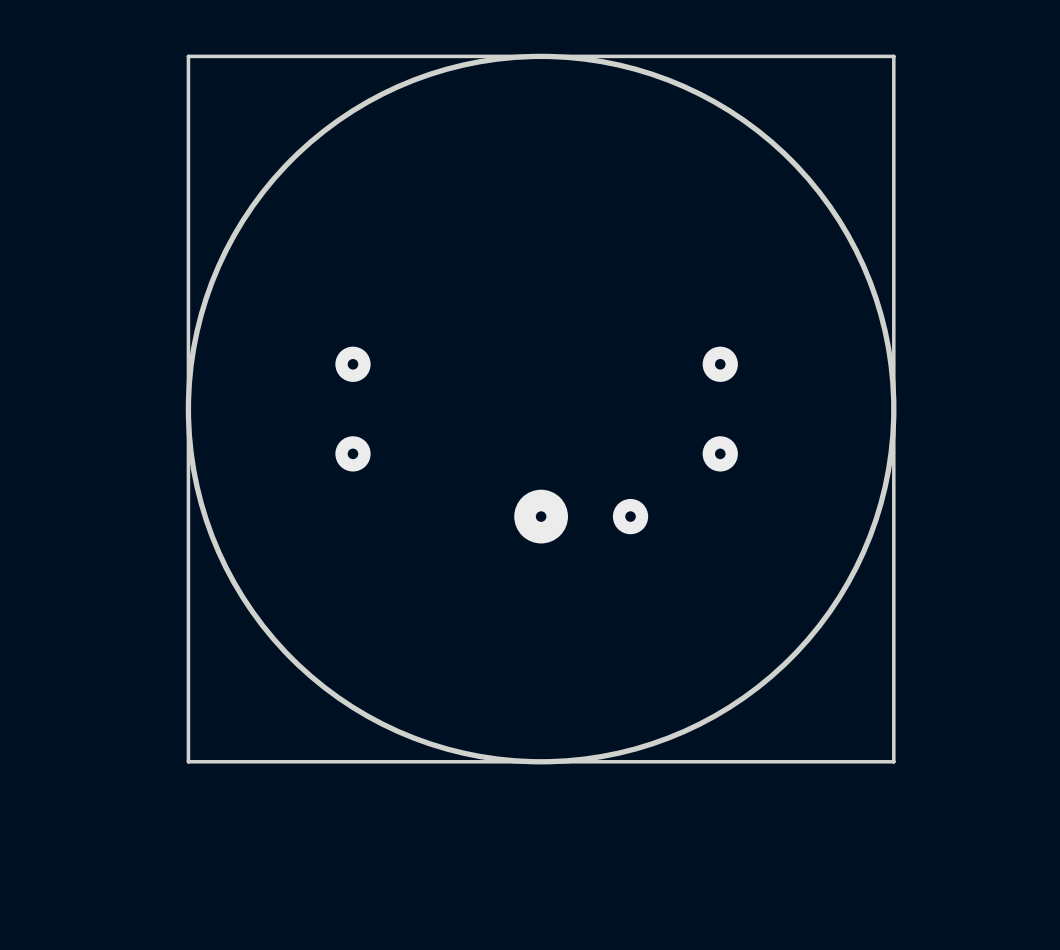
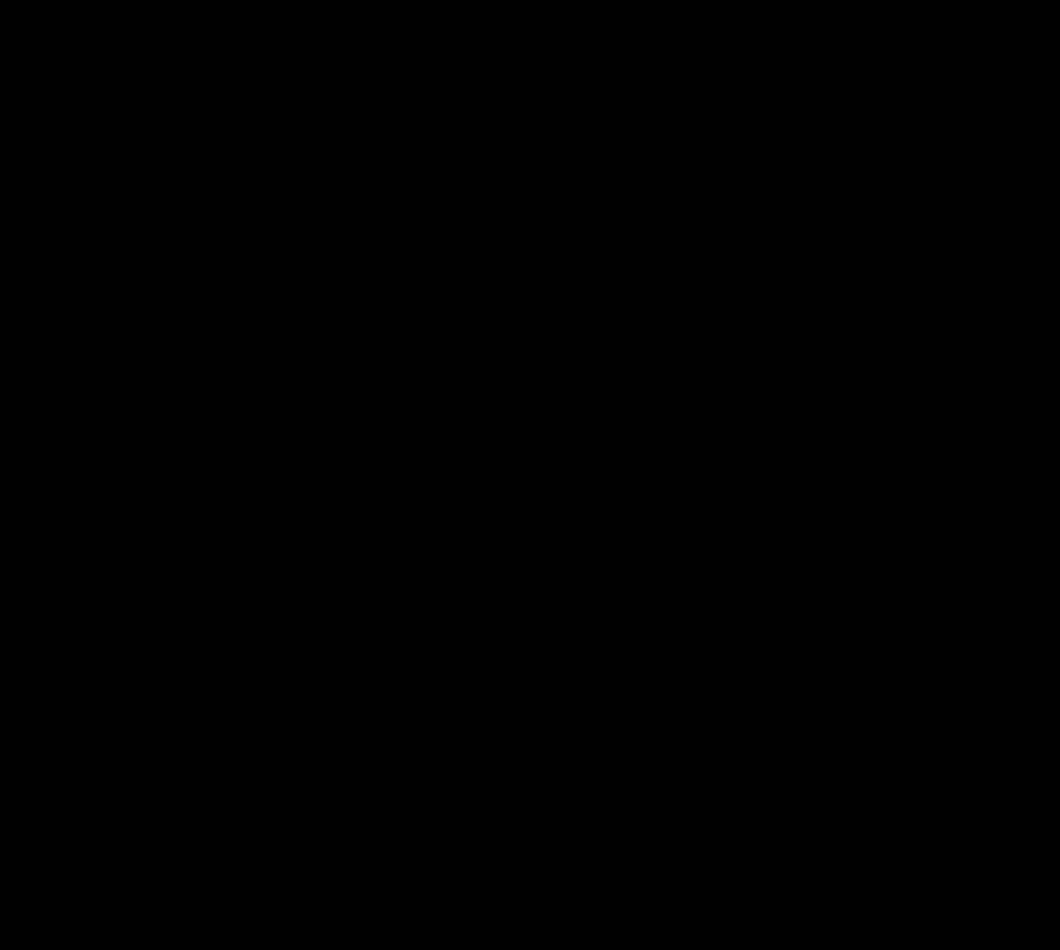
round board edge: [185, 53, 897, 765] -> none
board edge: (893, 56) (893, 761) (188, 761) (188, 56) (893, 56) -> none
via: (352, 364) -> none
via: (720, 364) -> none
via: (352, 453) -> none
via: (720, 453) -> none
via: (541, 516) -> none
via: (630, 516) -> none

